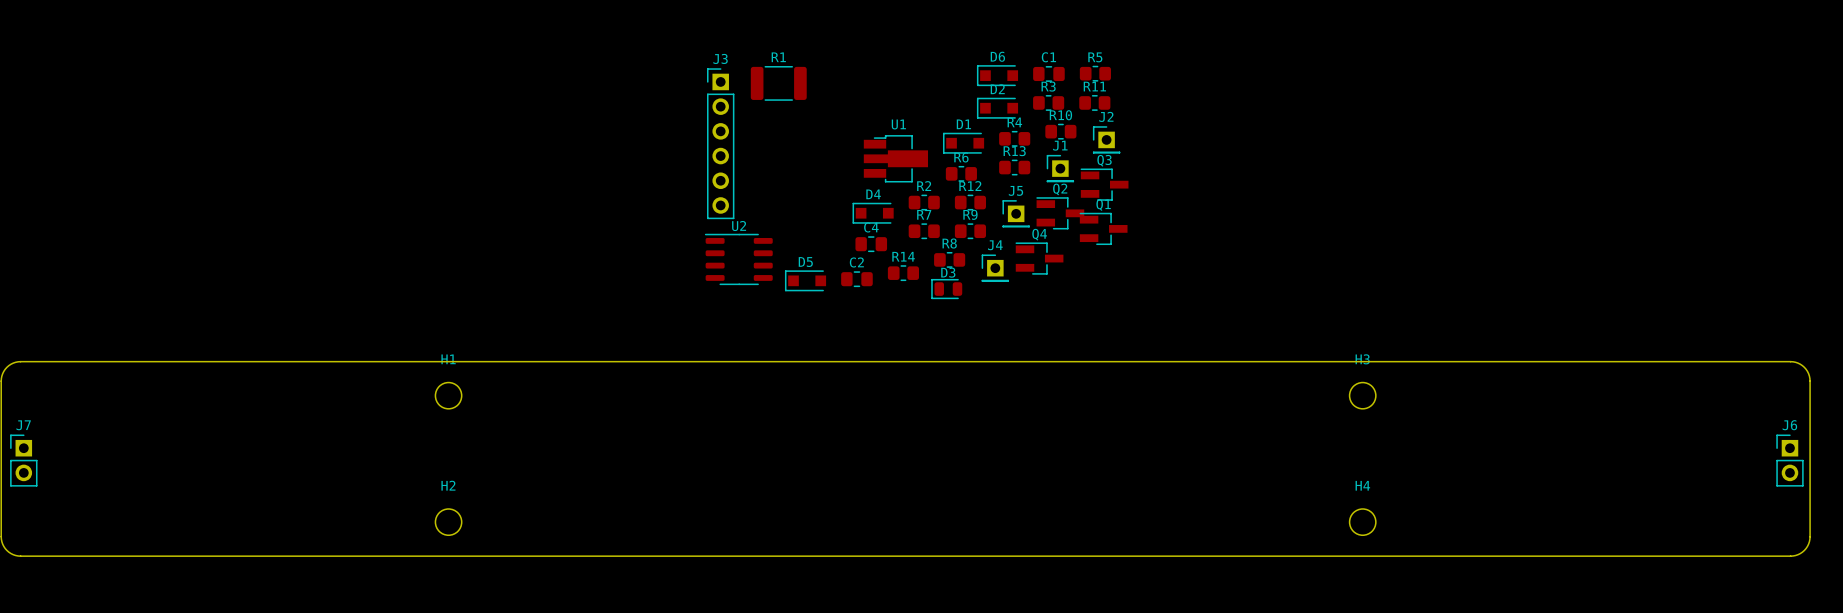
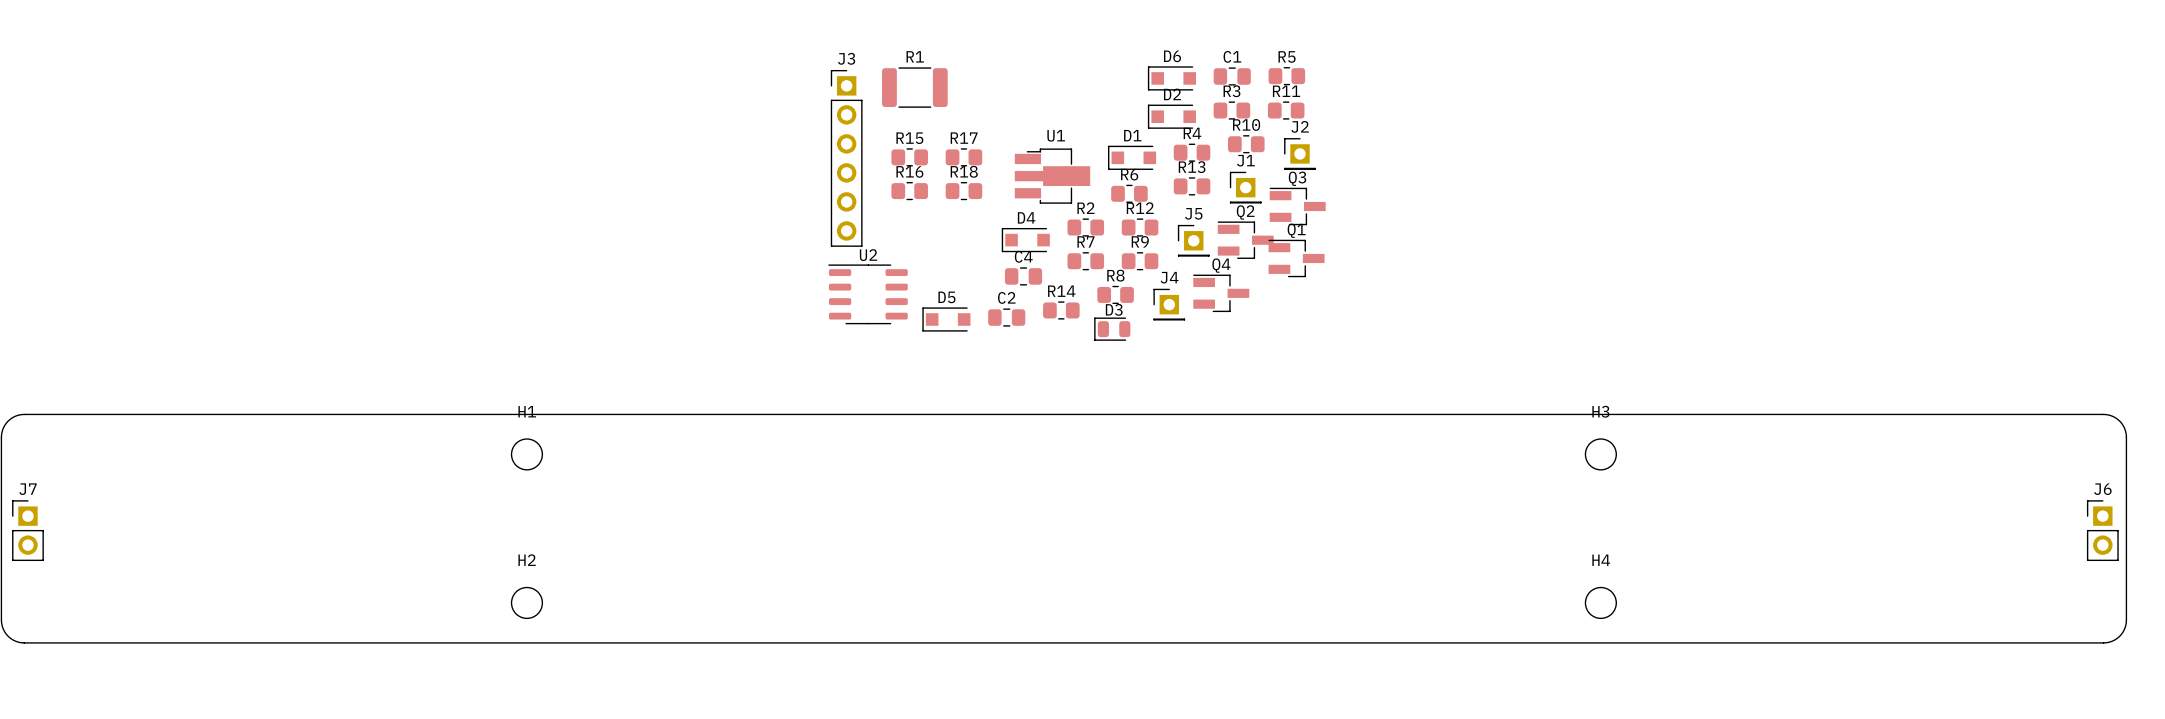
R15: none -> (909, 157)
R17: none -> (963, 157)
R16: none -> (909, 191)
R18: none -> (963, 191)

